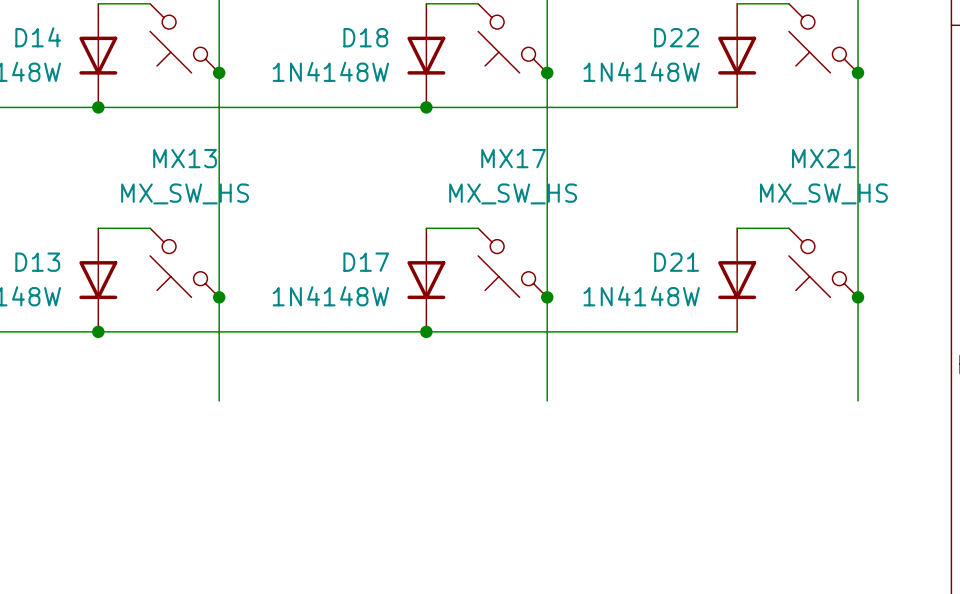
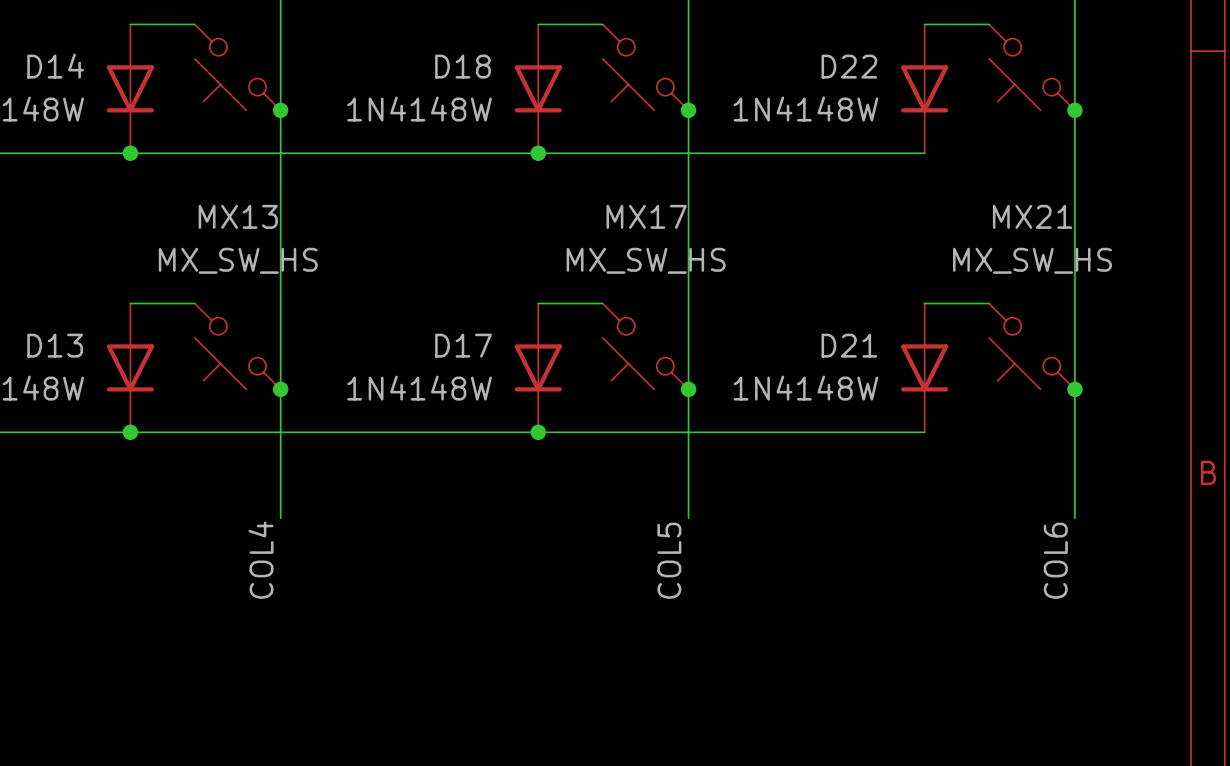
label: none -> COL4 (261, 560)
label: none -> COL5 (669, 560)
label: none -> COL6 (1055, 560)

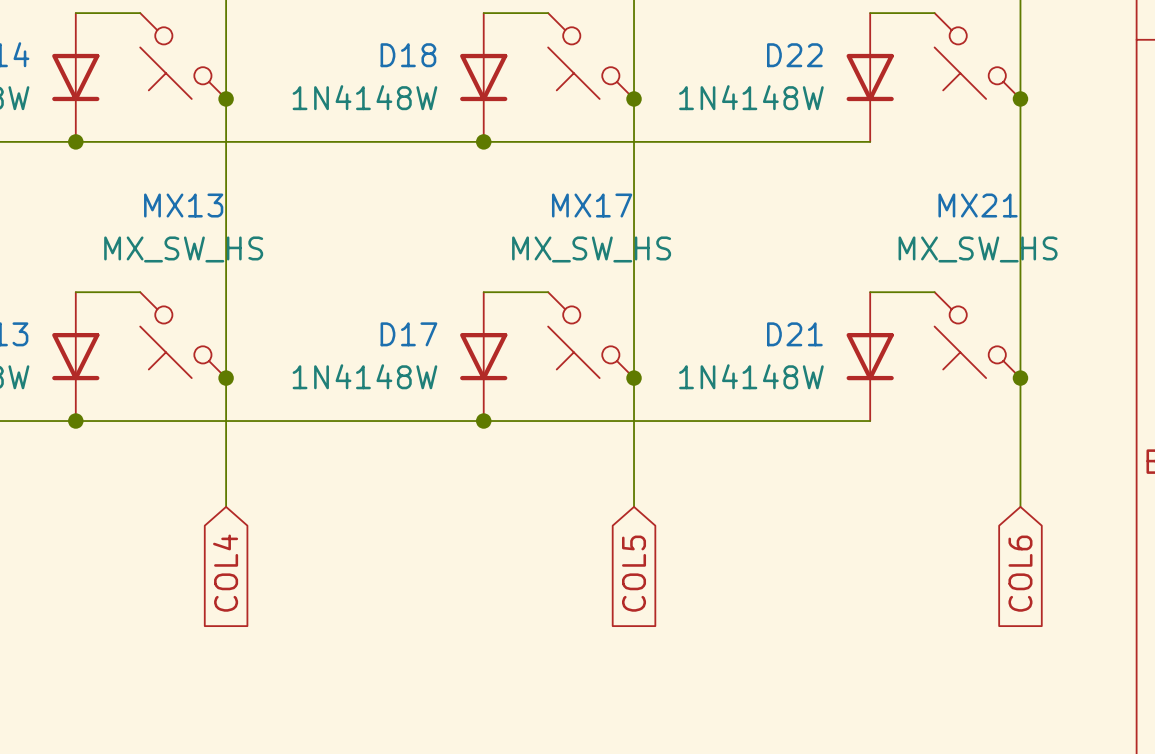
label: COL4 (261, 560) -> none
label: COL5 (669, 560) -> none
label: COL6 (1055, 560) -> none
global label: none -> COL4 (225, 573)
global label: none -> COL5 (634, 573)
global label: none -> COL6 (1020, 573)

